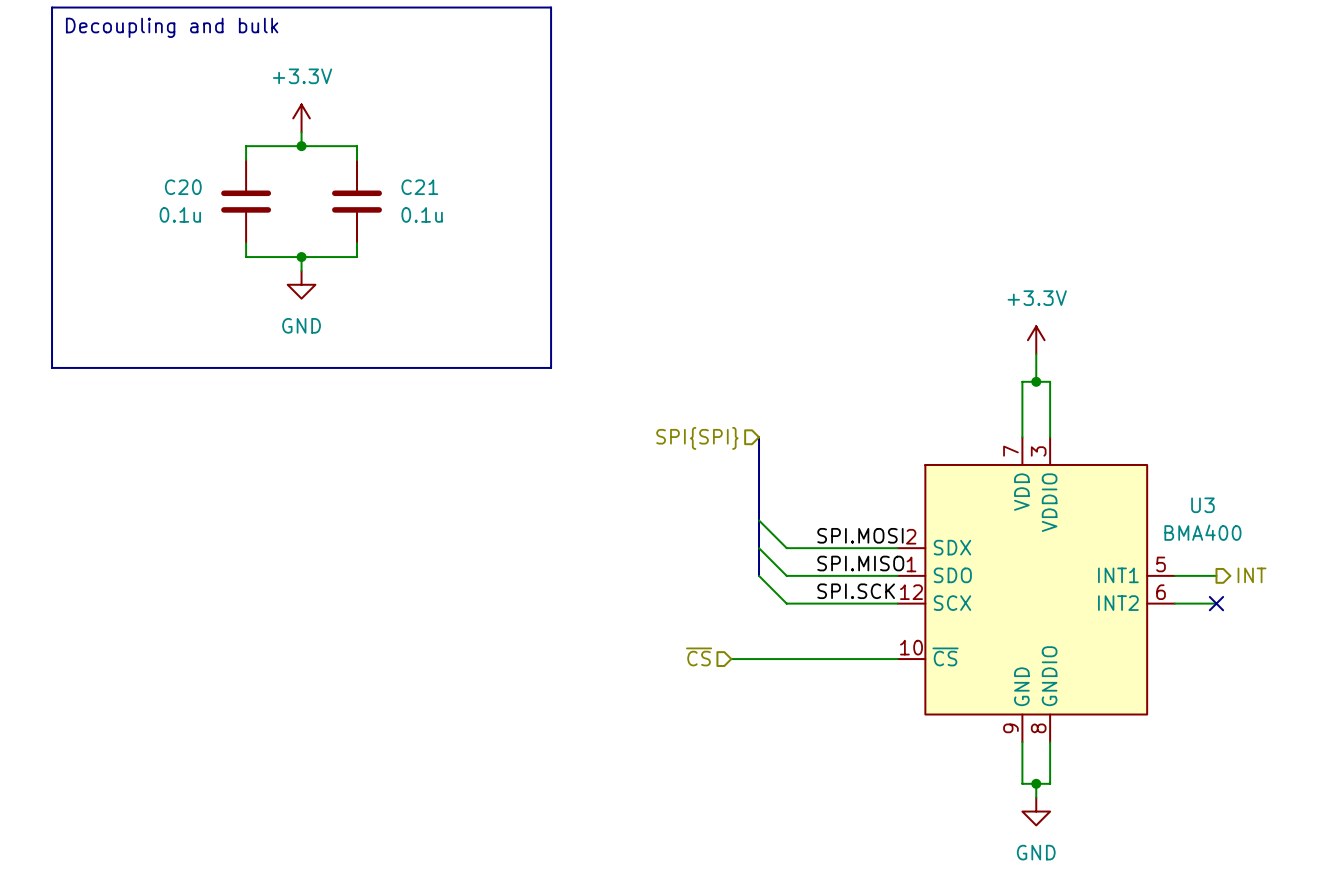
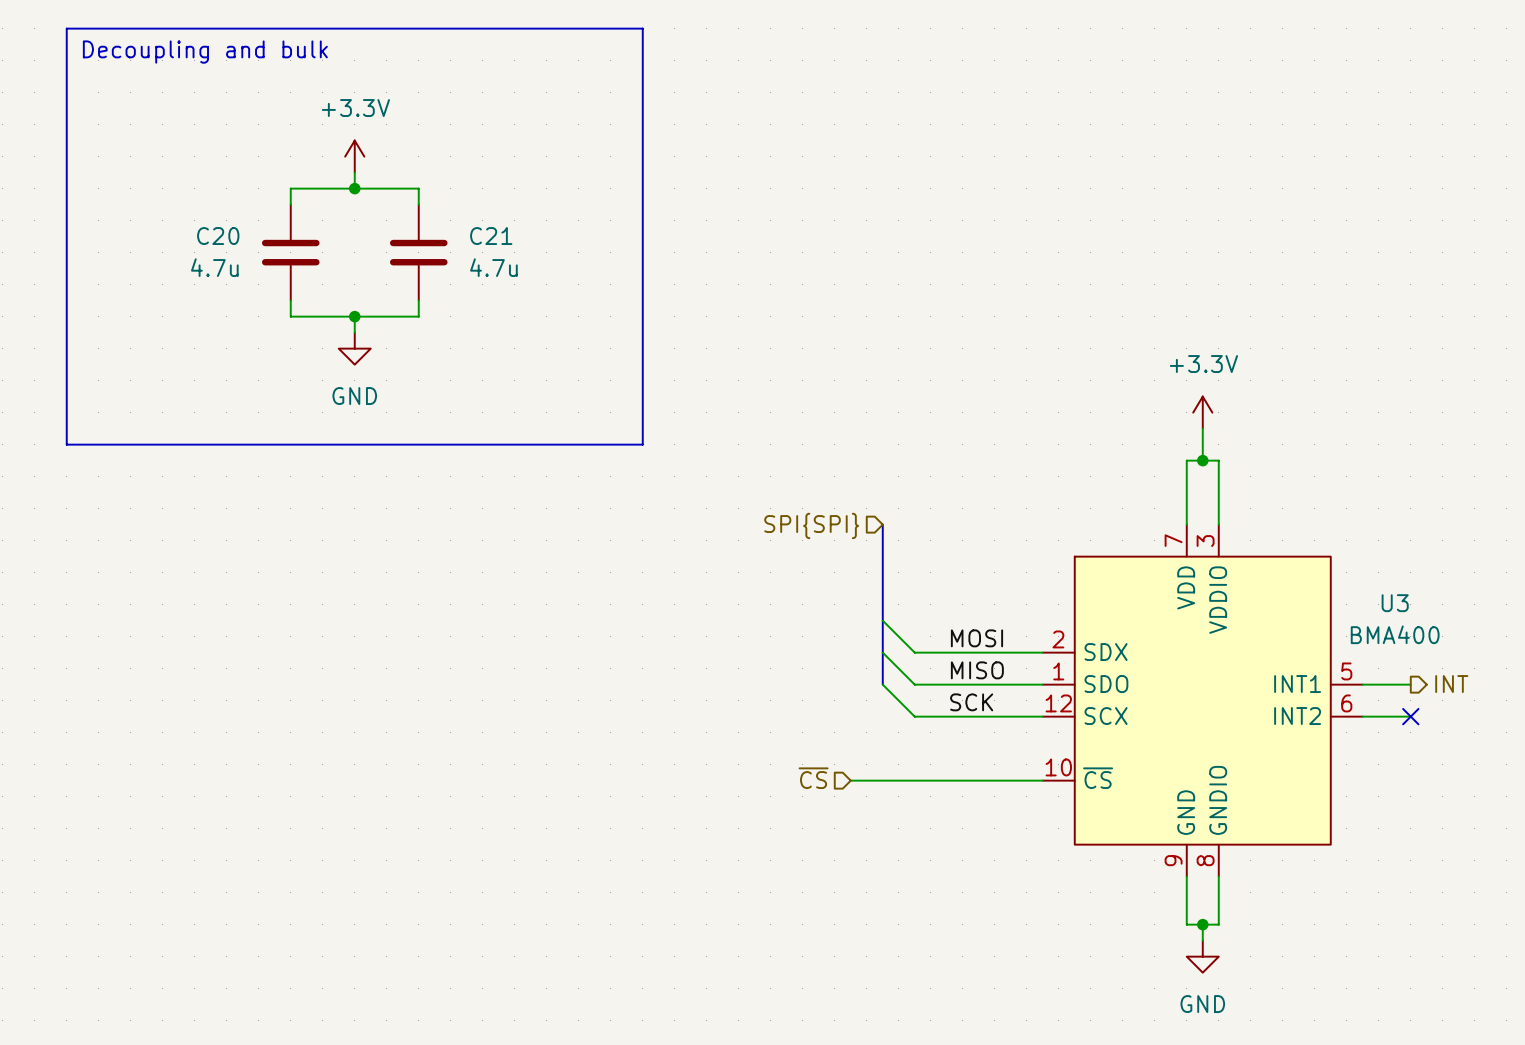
C20 value: 0.1u (180, 214) -> 4.7u (214, 267)
C21 value: 0.1u (422, 214) -> 4.7u (493, 267)
label: SPI.MOSI (860, 535) -> MOSI (976, 638)
label: SPI.MISO (860, 563) -> MISO (977, 670)
label: SPI.SCK (856, 591) -> SCK (971, 702)

